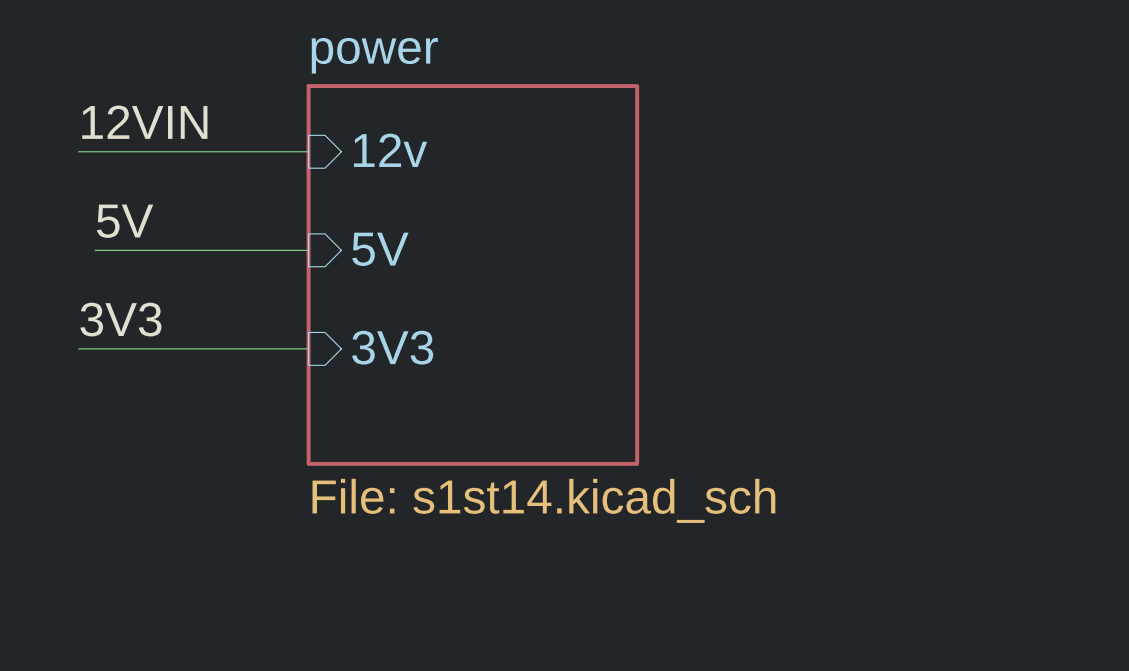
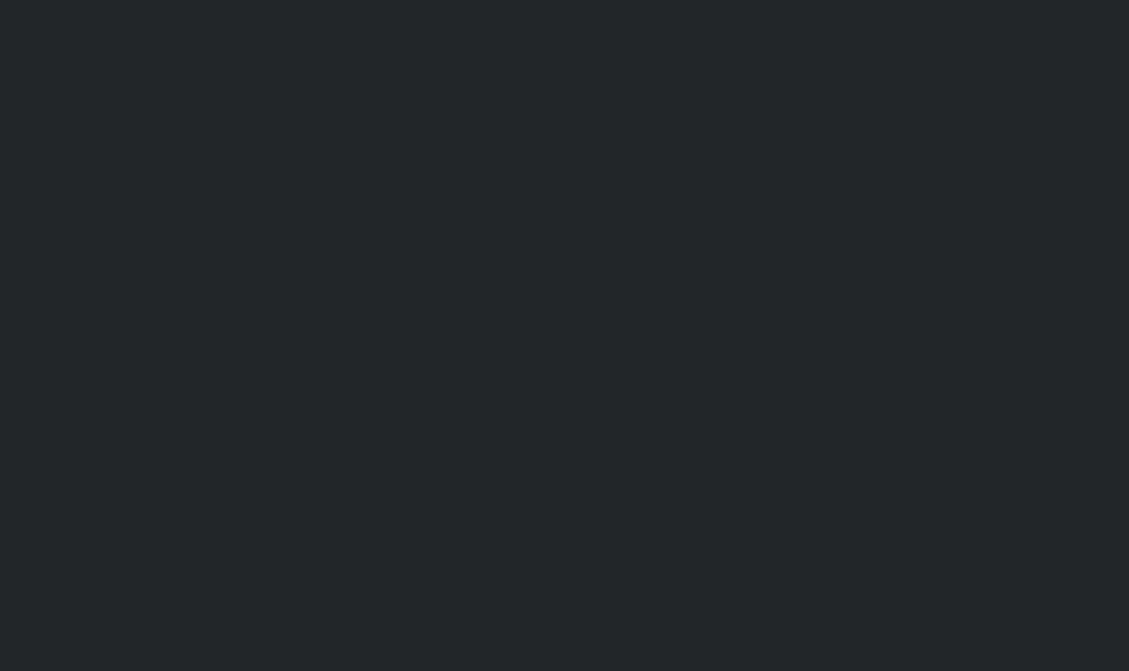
label: 12VIN (144, 122) -> none
sheet pin: 12v (390, 150) -> none
wire: (78, 151) (308, 151) -> none
label: 5V (125, 221) -> none
sheet pin: 5V (380, 249) -> none
wire: (95, 250) (308, 250) -> none
sheet power: File: s1st14.kicad_sch (472, 274) -> none
label: 3V3 (120, 319) -> none
sheet pin: 3V3 (392, 347) -> none
wire: (78, 348) (308, 348) -> none

